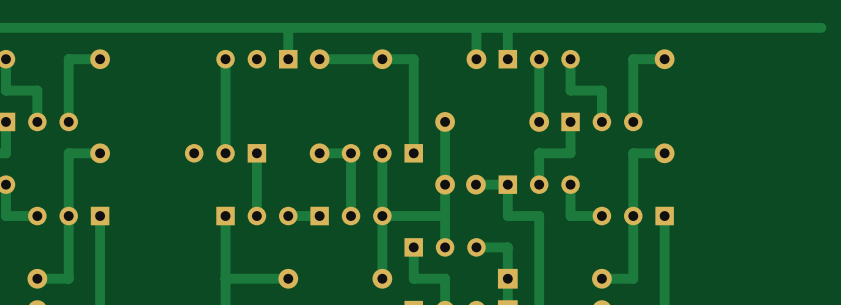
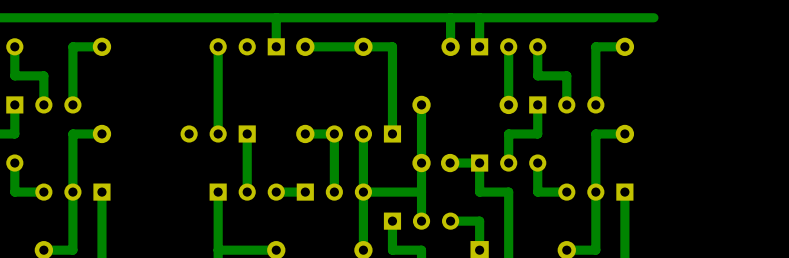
track: (821, 27) (696, 27) -> none

